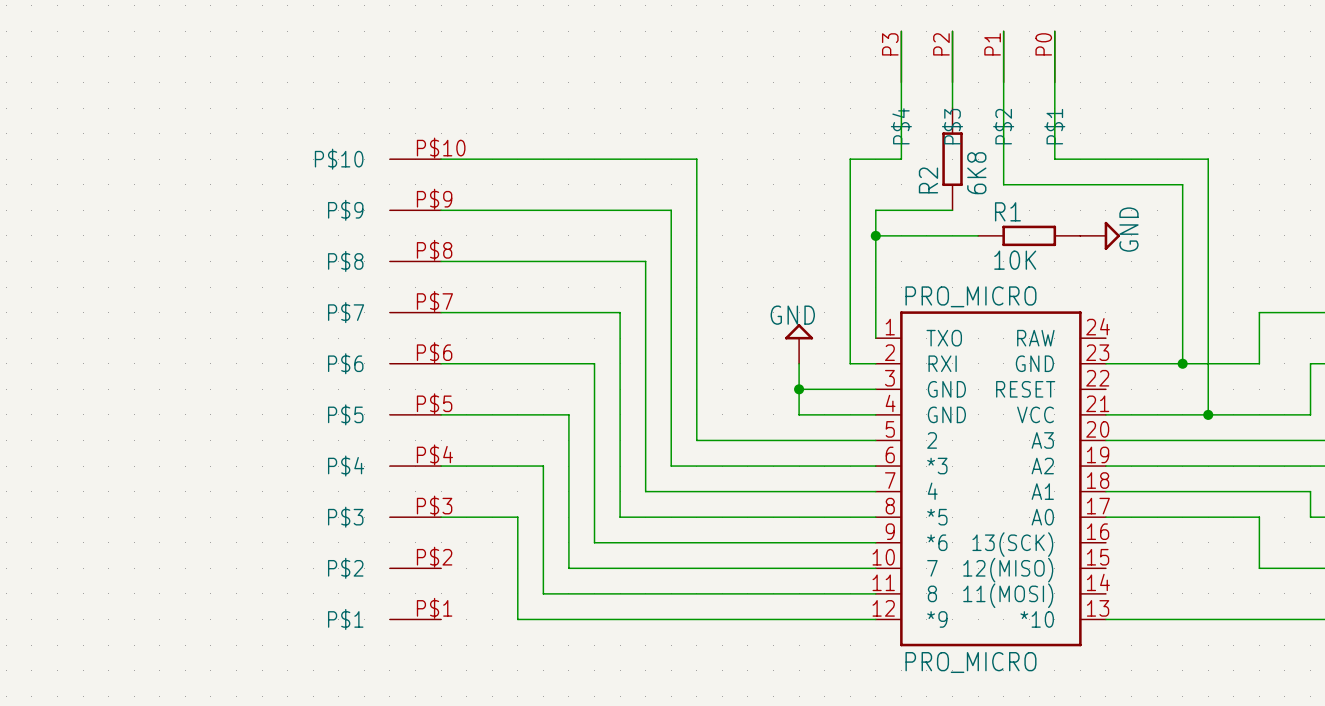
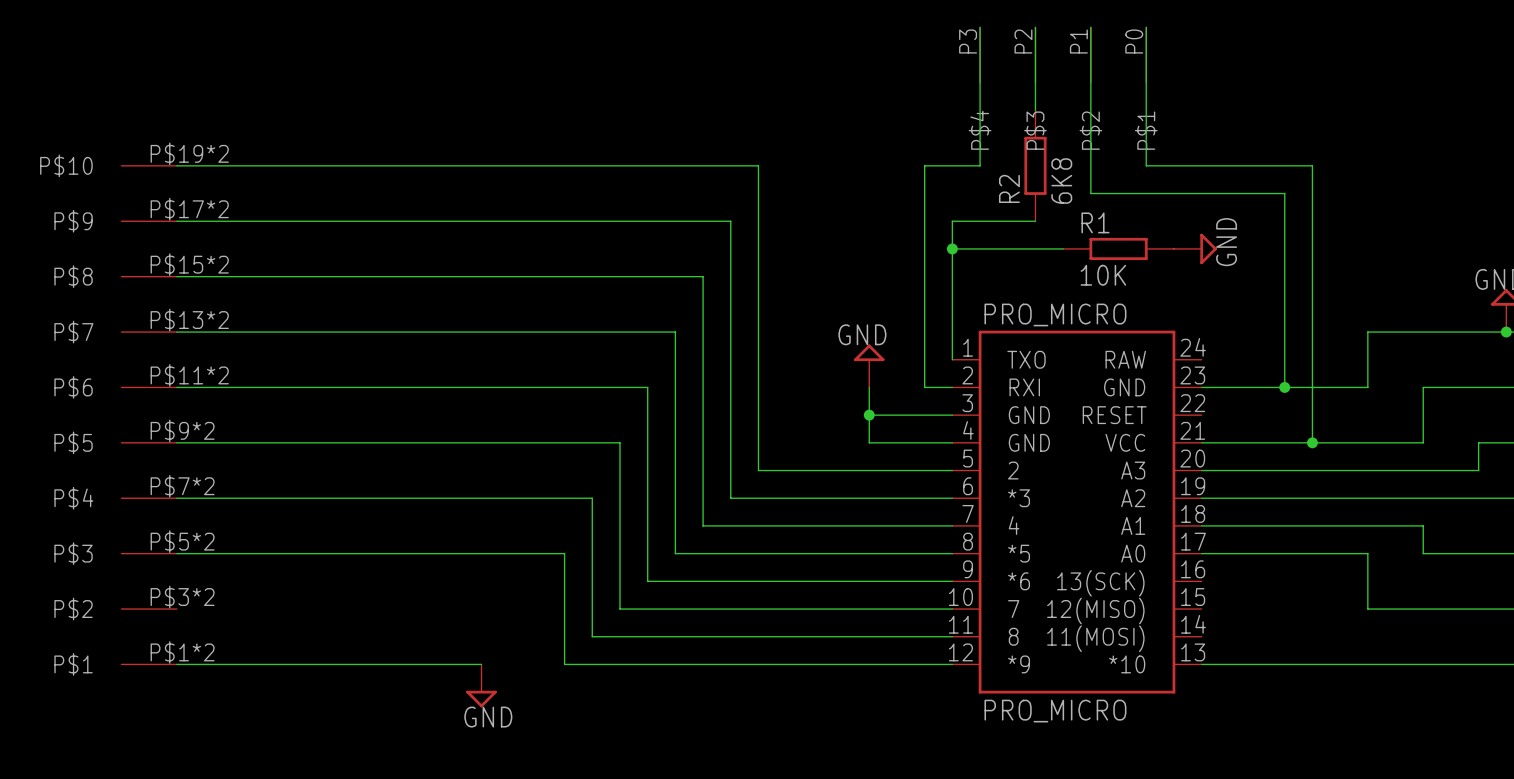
wire: none -> (176, 165) (481, 165)
wire: none -> (176, 221) (481, 221)
wire: none -> (176, 276) (481, 276)
wire: none -> (176, 332) (481, 332)
wire: none -> (176, 387) (481, 387)
part: none -> (149, 415)
part: (415, 389) -> none
wire: none -> (176, 442) (481, 442)
wire: none -> (176, 498) (481, 498)
wire: none -> (176, 553) (481, 553)
wire: none -> (176, 664) (481, 664)
power symbol: none -> GND (481, 685)

